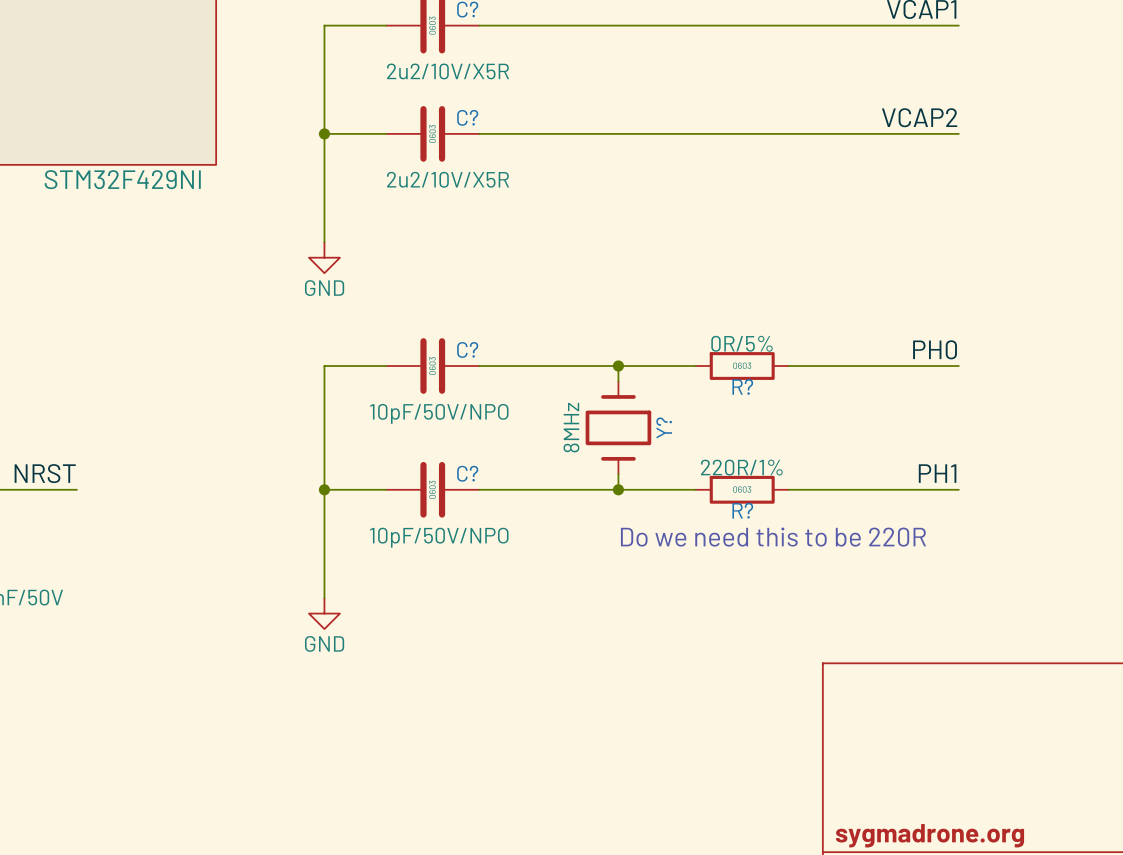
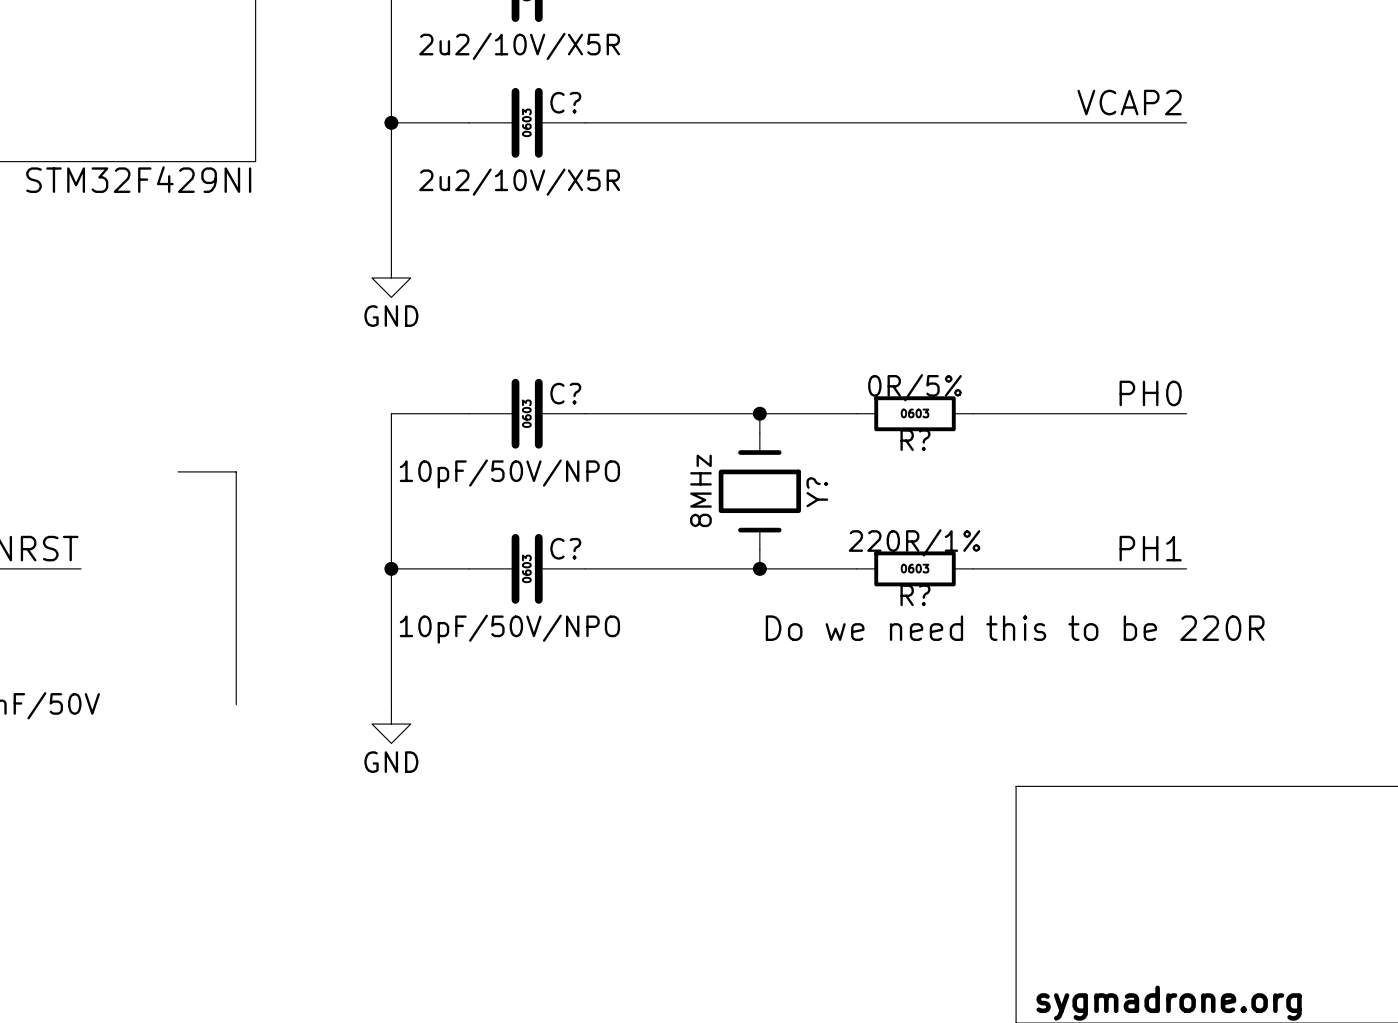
wire: none -> (178, 471) (236, 471) (236, 704)

